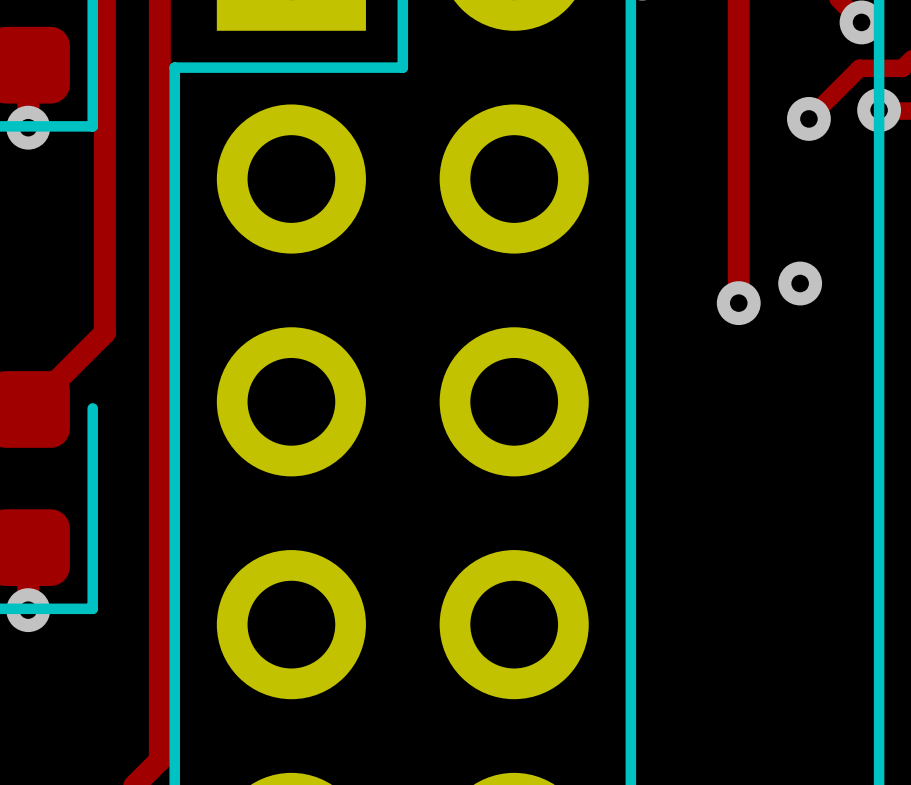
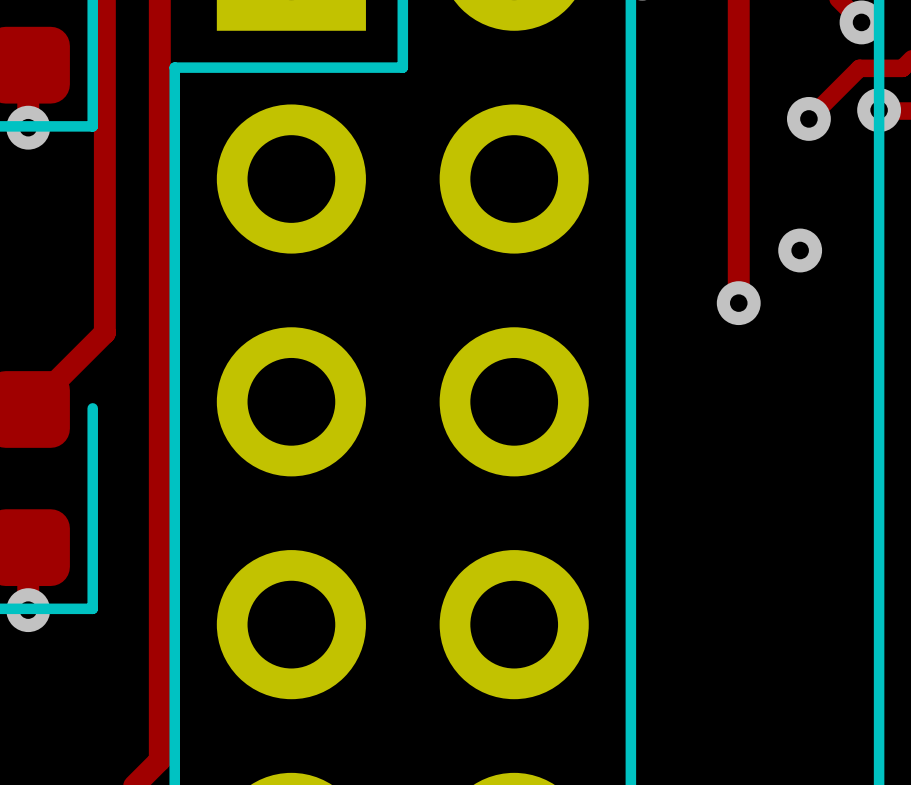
via position: (800, 283) -> (800, 250)

